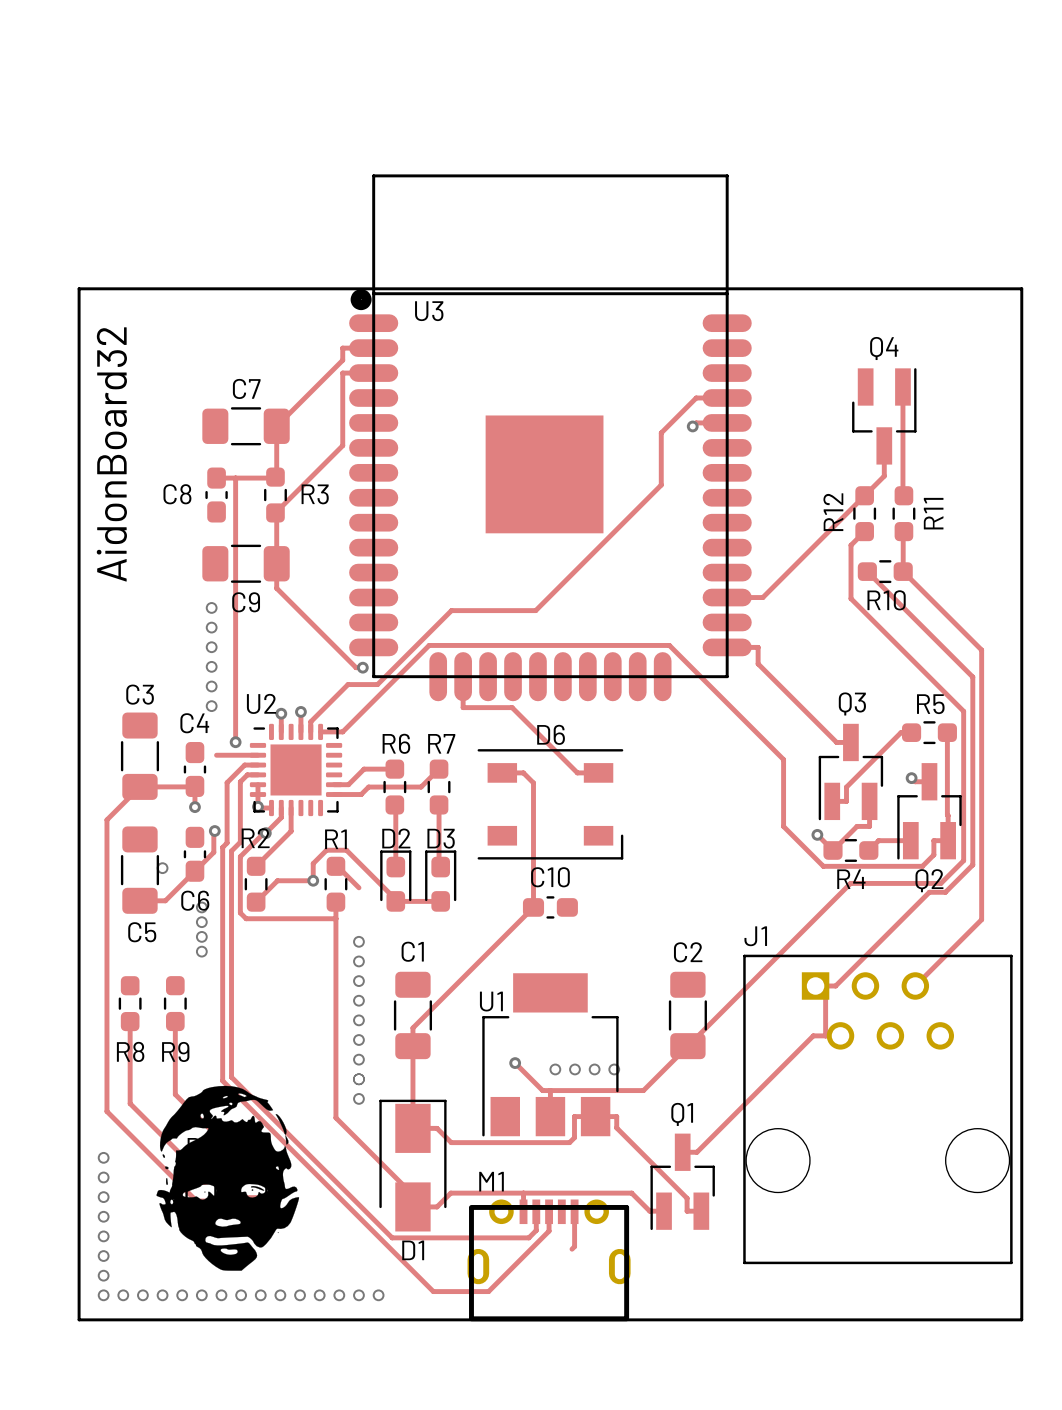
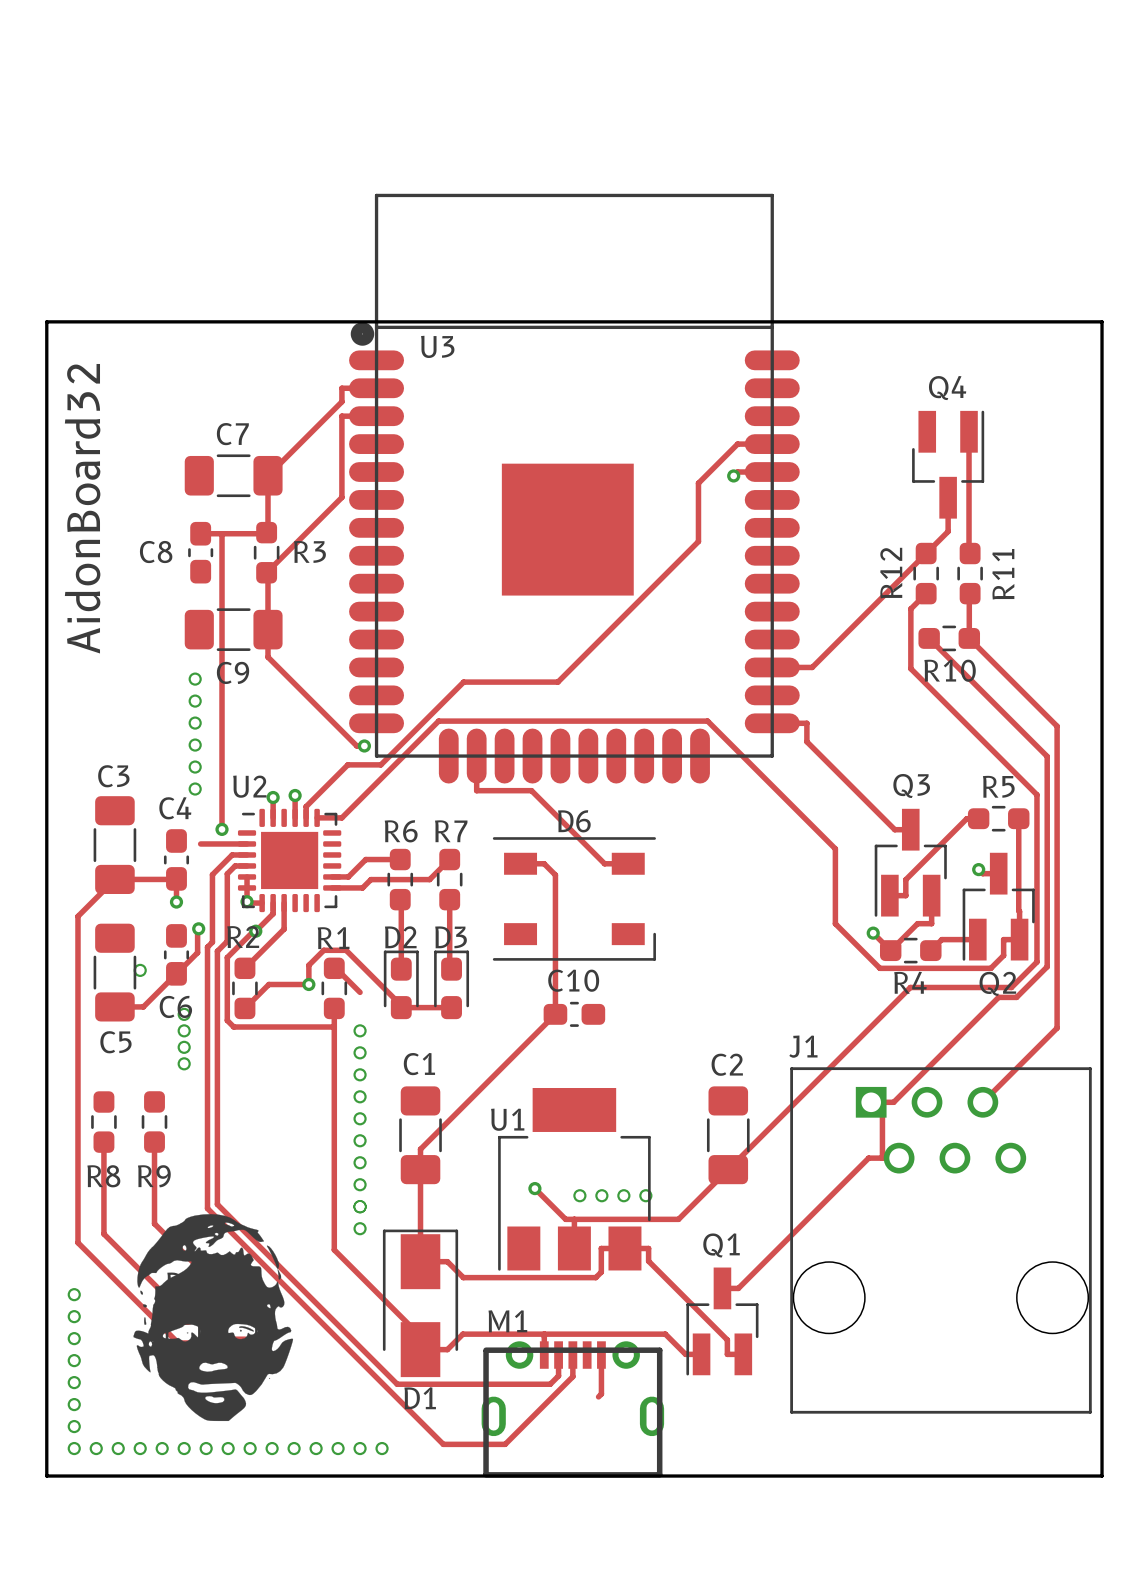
via: none -> (360, 1030)

